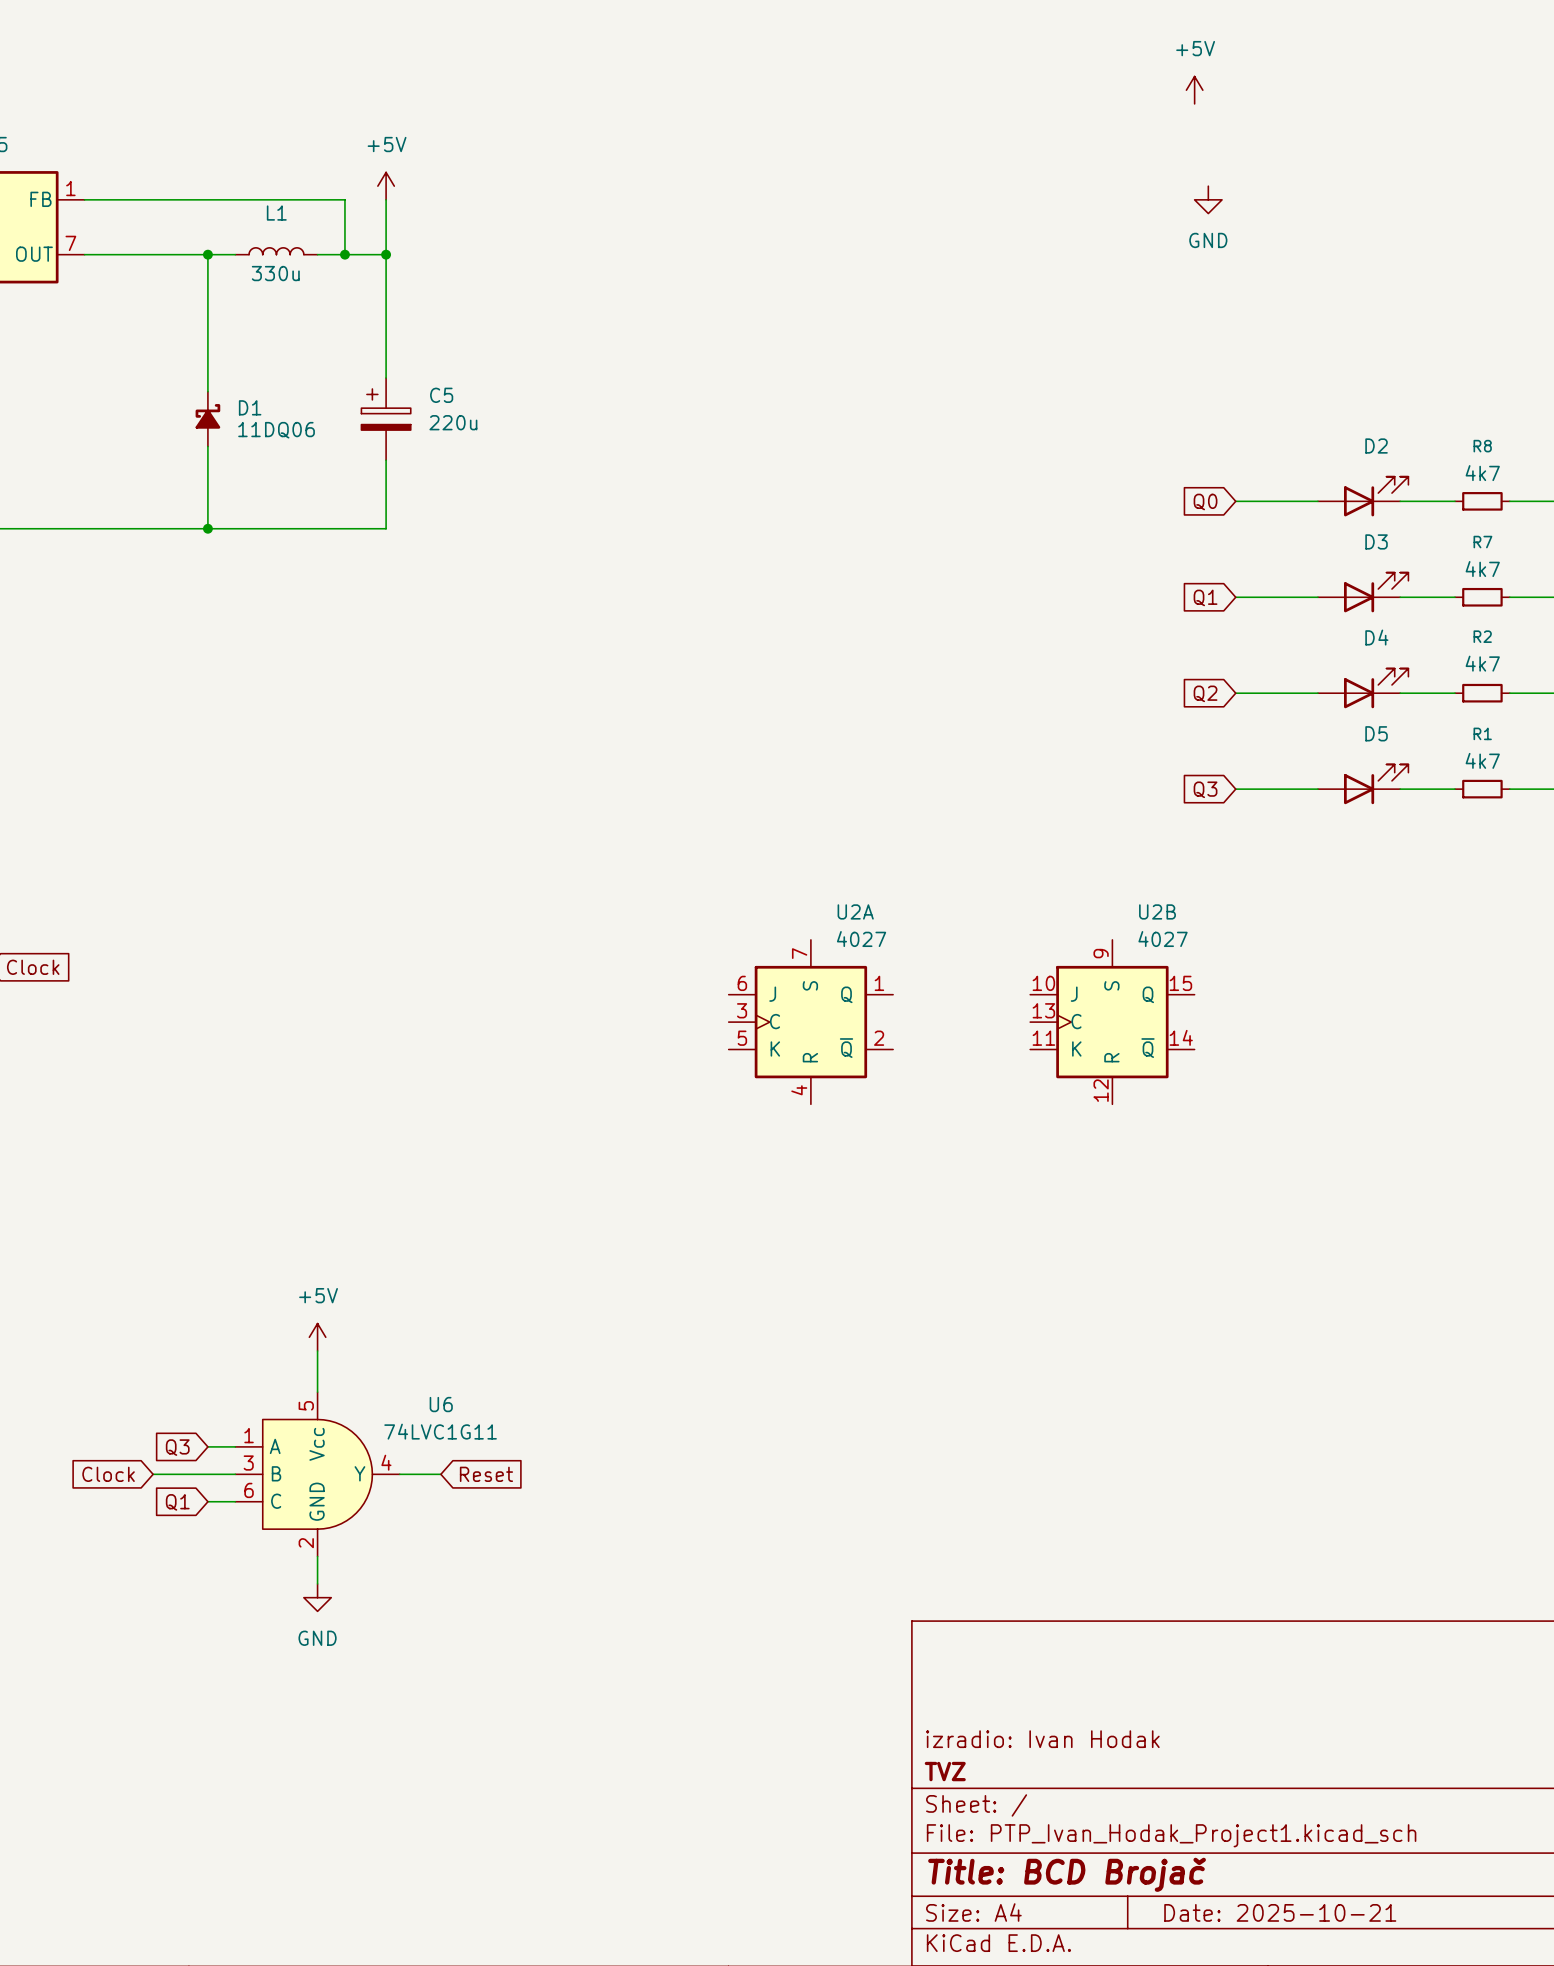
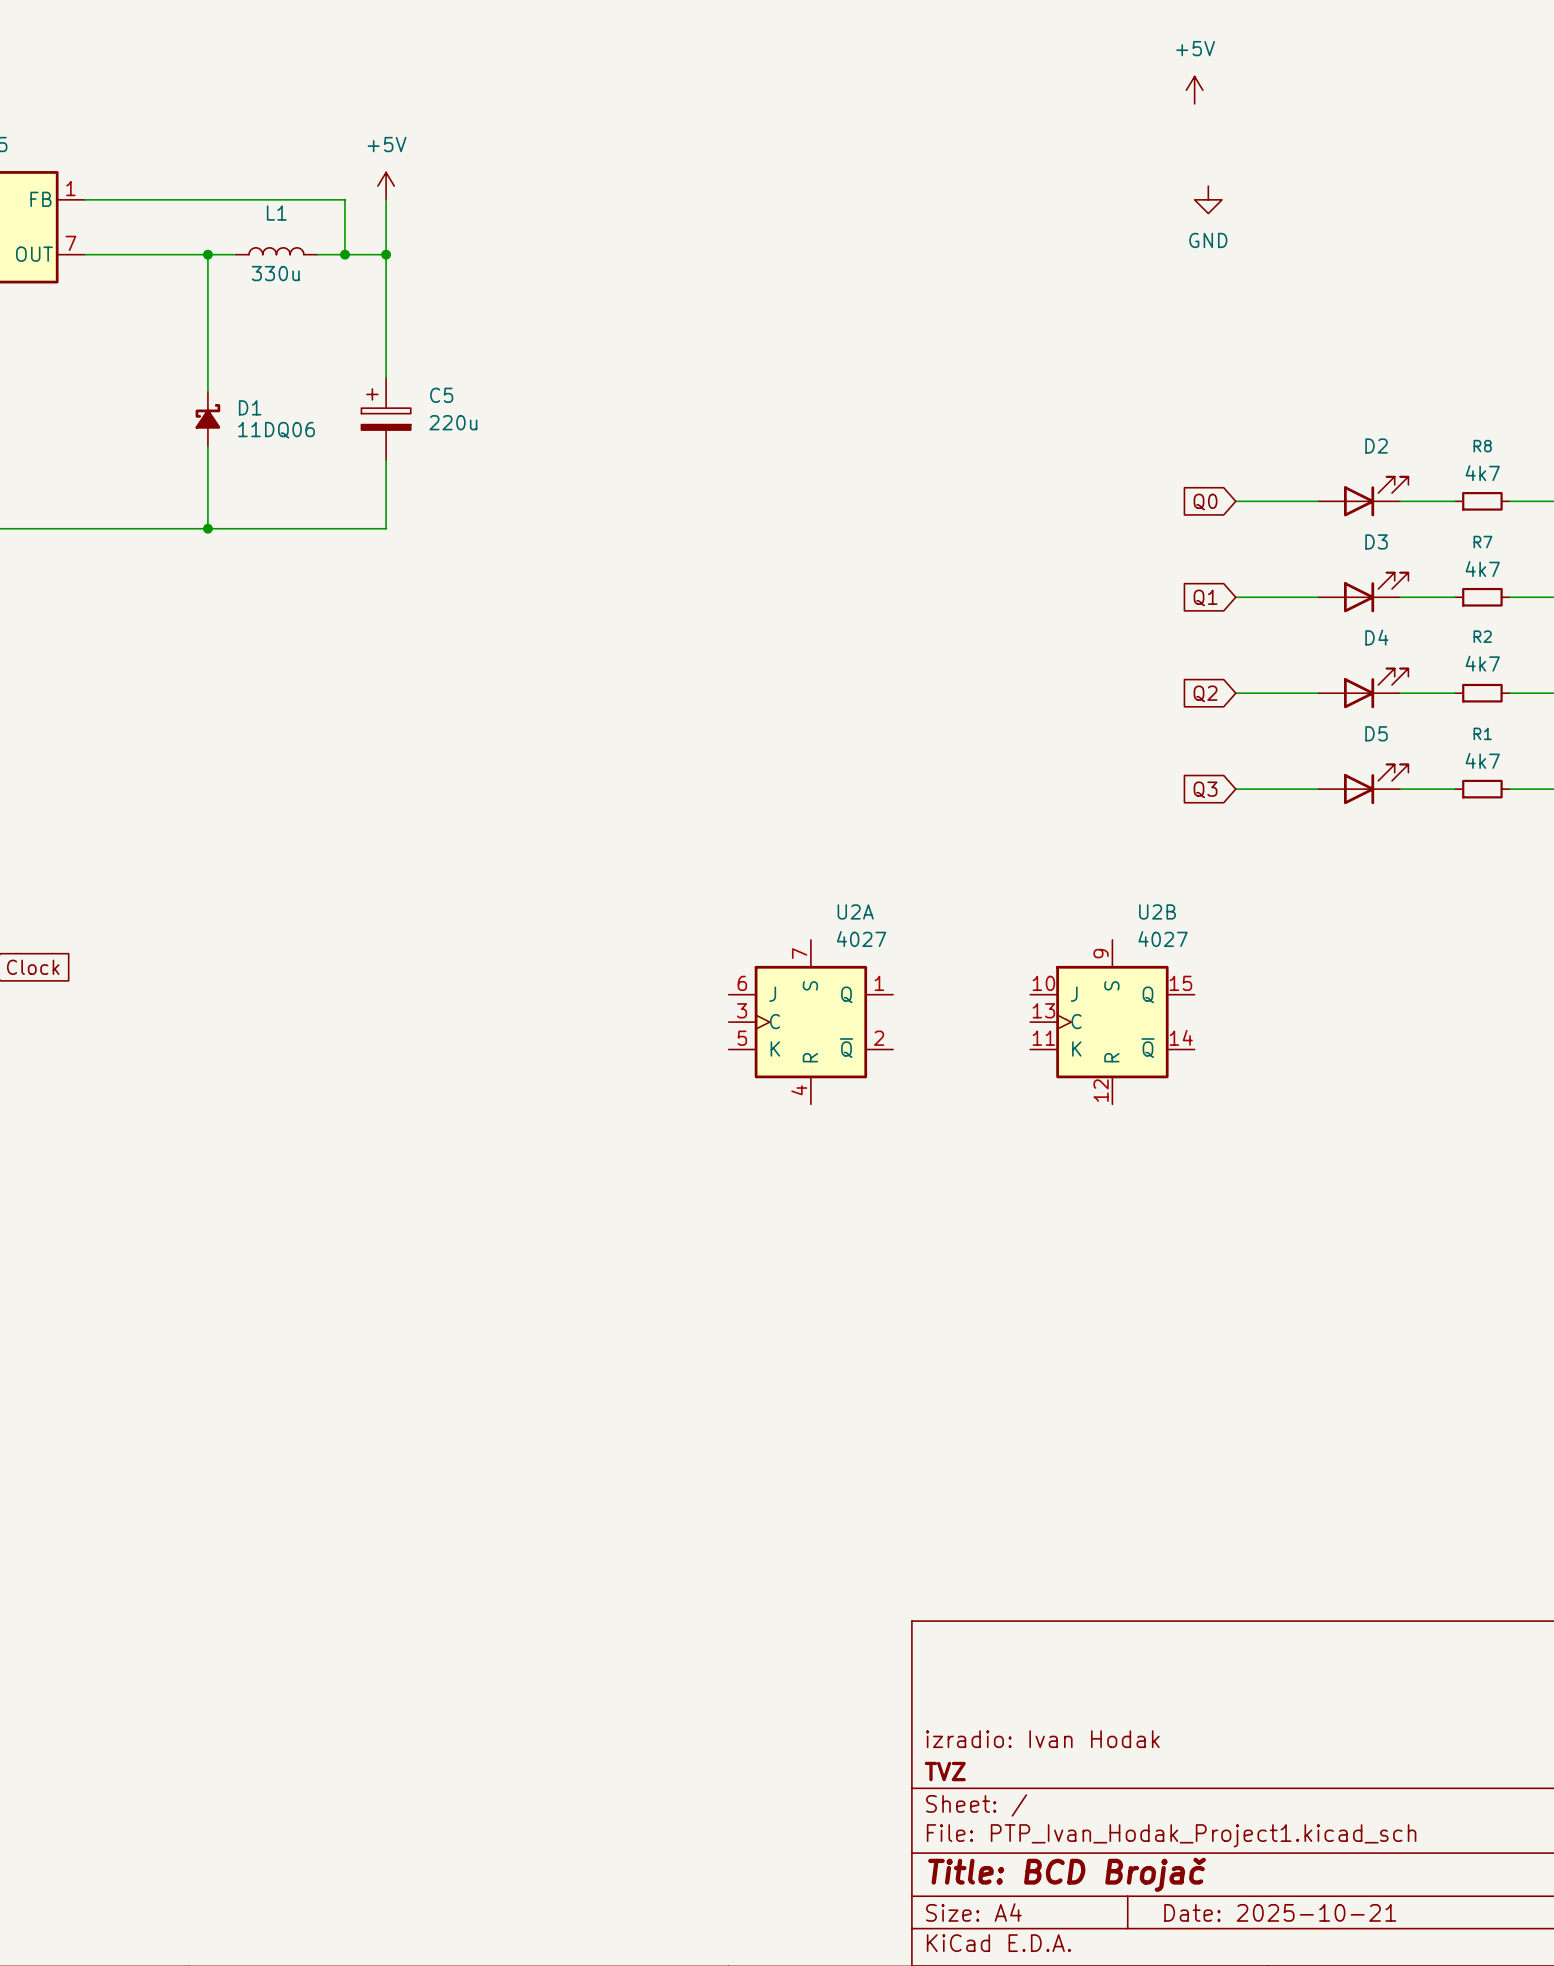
power symbol: +5V (317, 1337) -> none
wire: (317, 1350) (317, 1392) -> none
wire: (207, 1446) (235, 1446) -> none
global label: Q3 (177, 1447) -> none
global label: Clock (108, 1474) -> none
wire: (153, 1474) (235, 1474) -> none
U6: 74LVC1G11 (317, 1474) -> none
wire: (399, 1474) (440, 1474) -> none
global label: Reset (486, 1474) -> none
wire: (207, 1501) (235, 1501) -> none
global label: Q1 (177, 1502) -> none
wire: (317, 1556) (317, 1583) -> none
power symbol: GND (317, 1597) -> none

